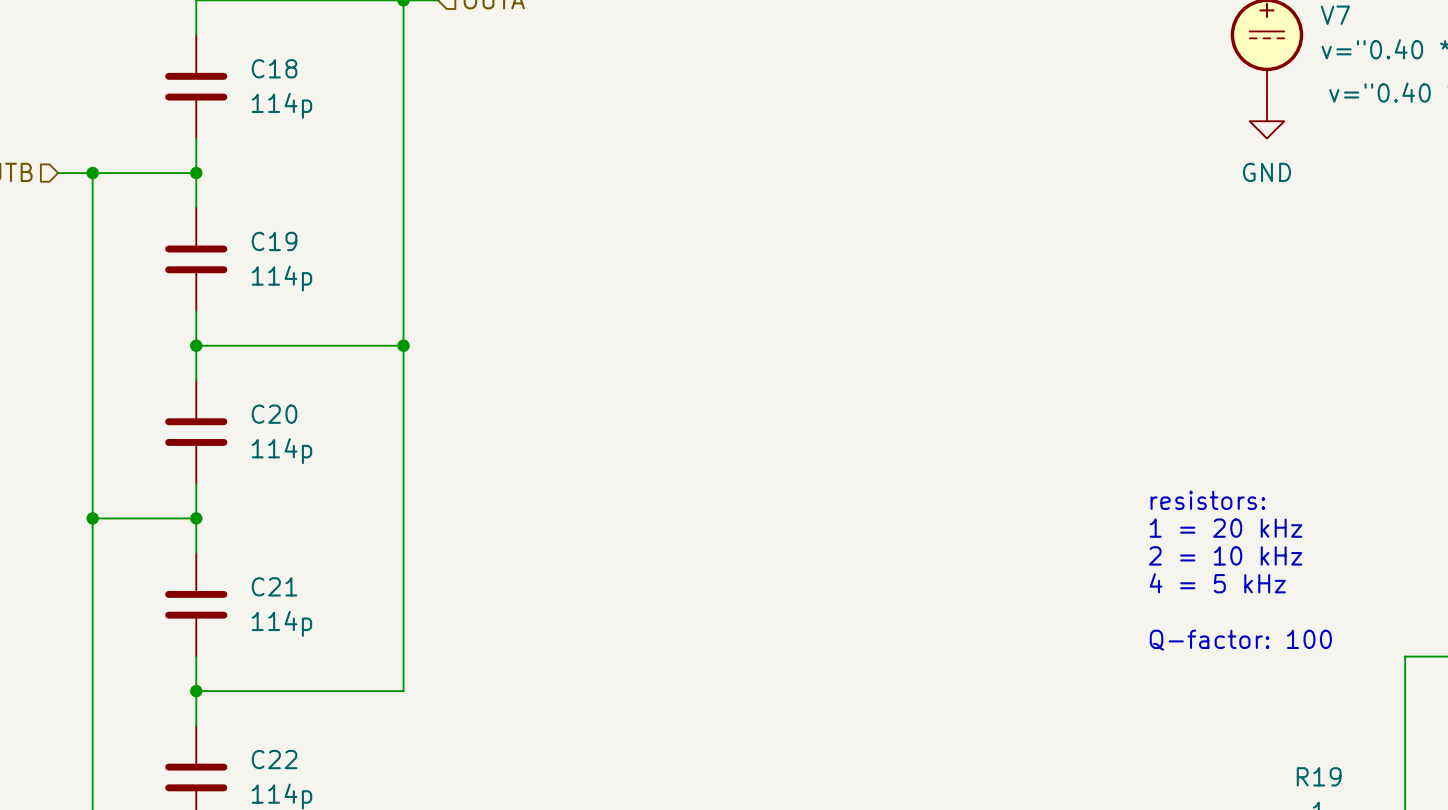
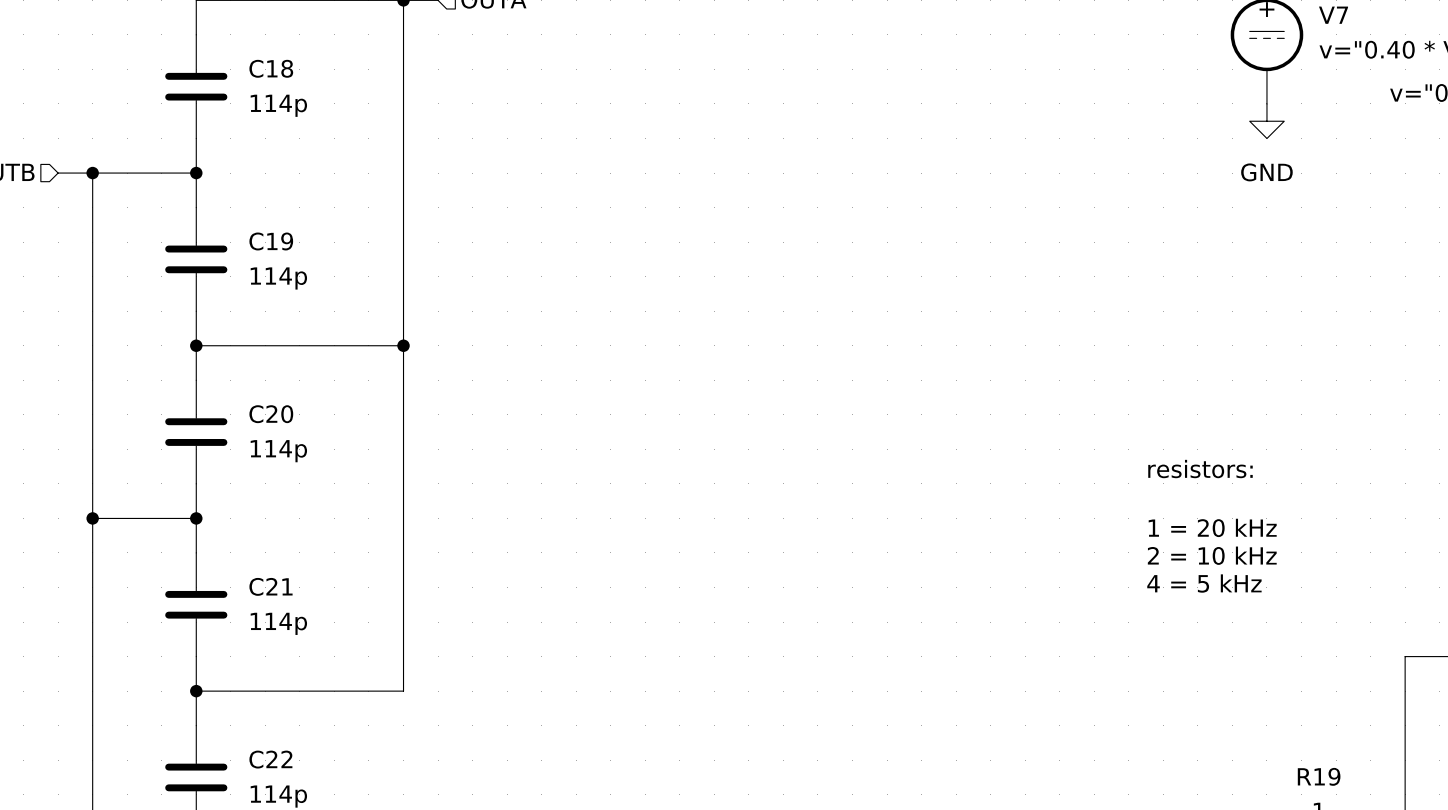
text position: resistors: (1207, 500) -> resistors: (1200, 469)
text: Q-factor: 100 (1240, 640) -> none

